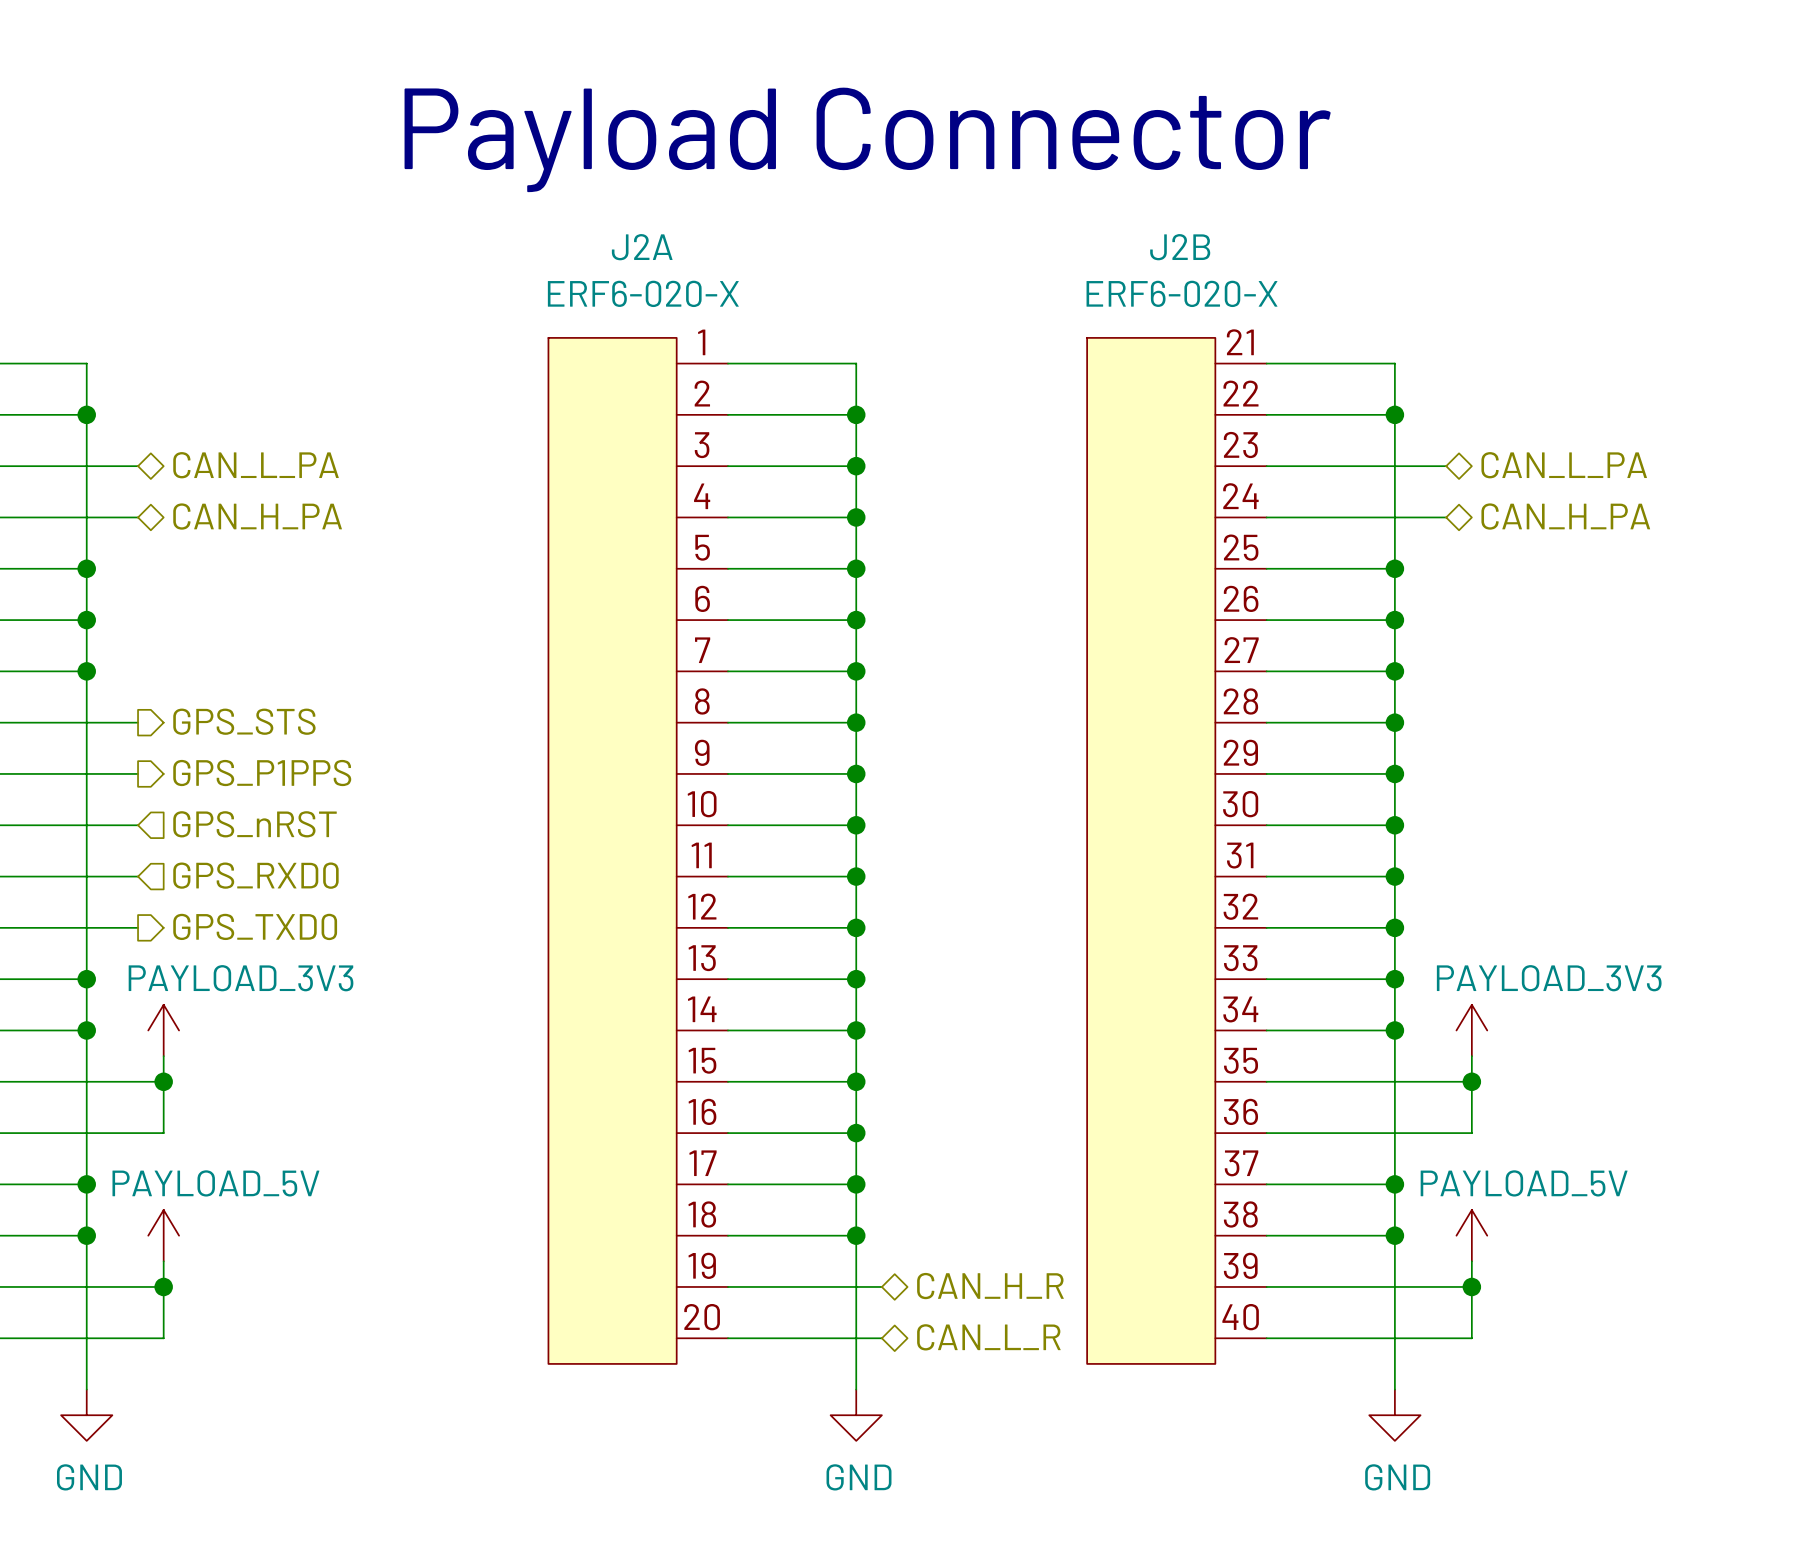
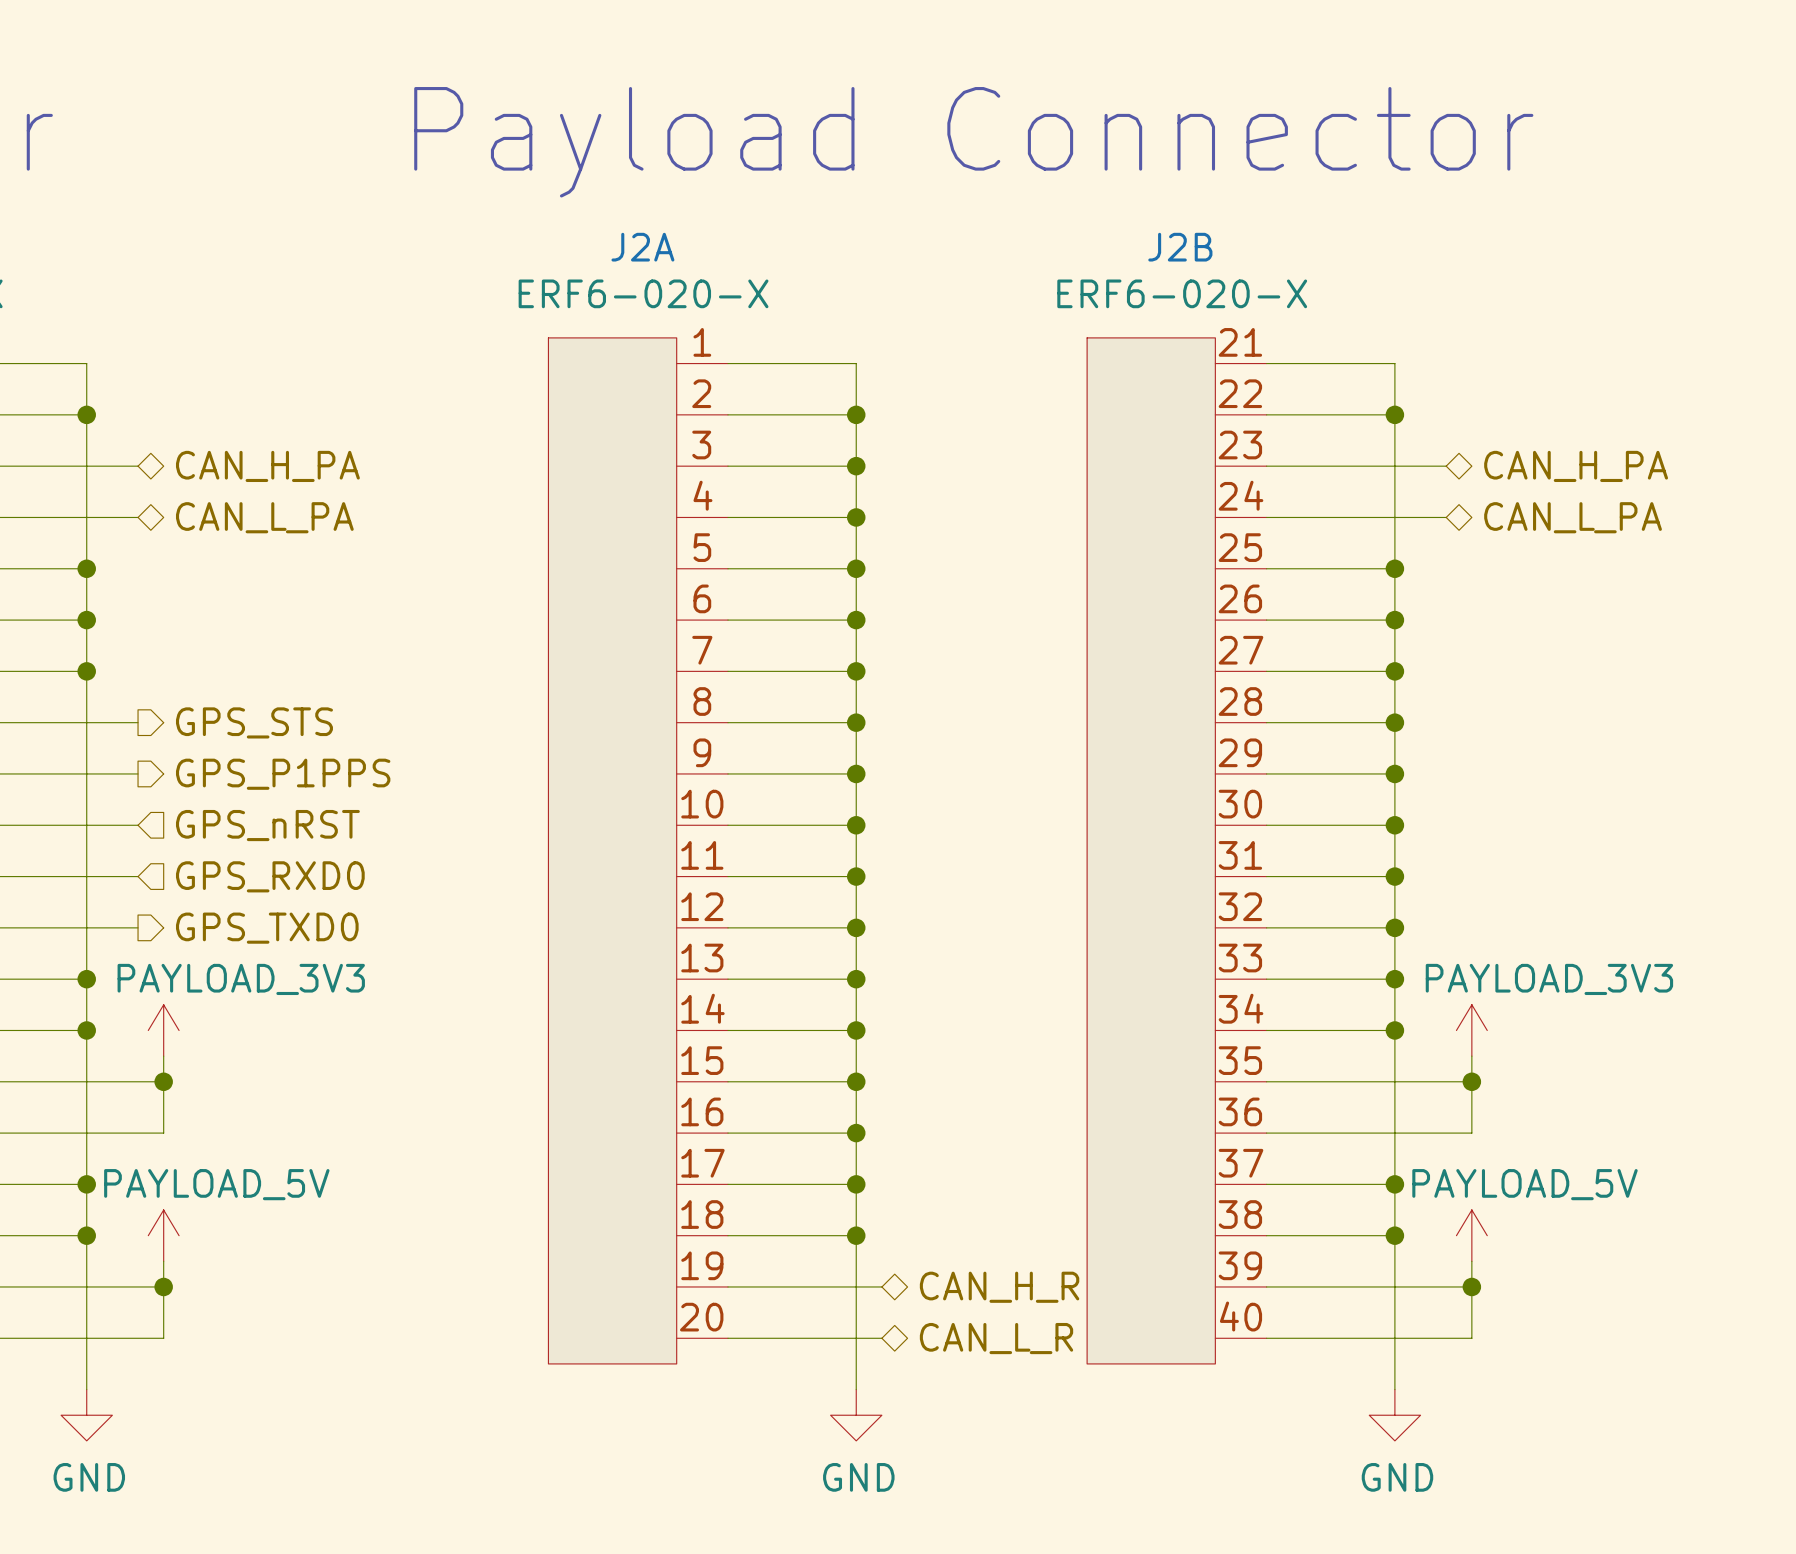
hierarchical label: CAN_L_PA (256, 465) -> CAN_H_PA (267, 466)
hierarchical label: CAN_L_PA (1564, 465) -> CAN_H_PA (1576, 466)
hierarchical label: CAN_H_PA (257, 516) -> CAN_L_PA (264, 517)
hierarchical label: CAN_H_PA (1565, 516) -> CAN_L_PA (1573, 517)

